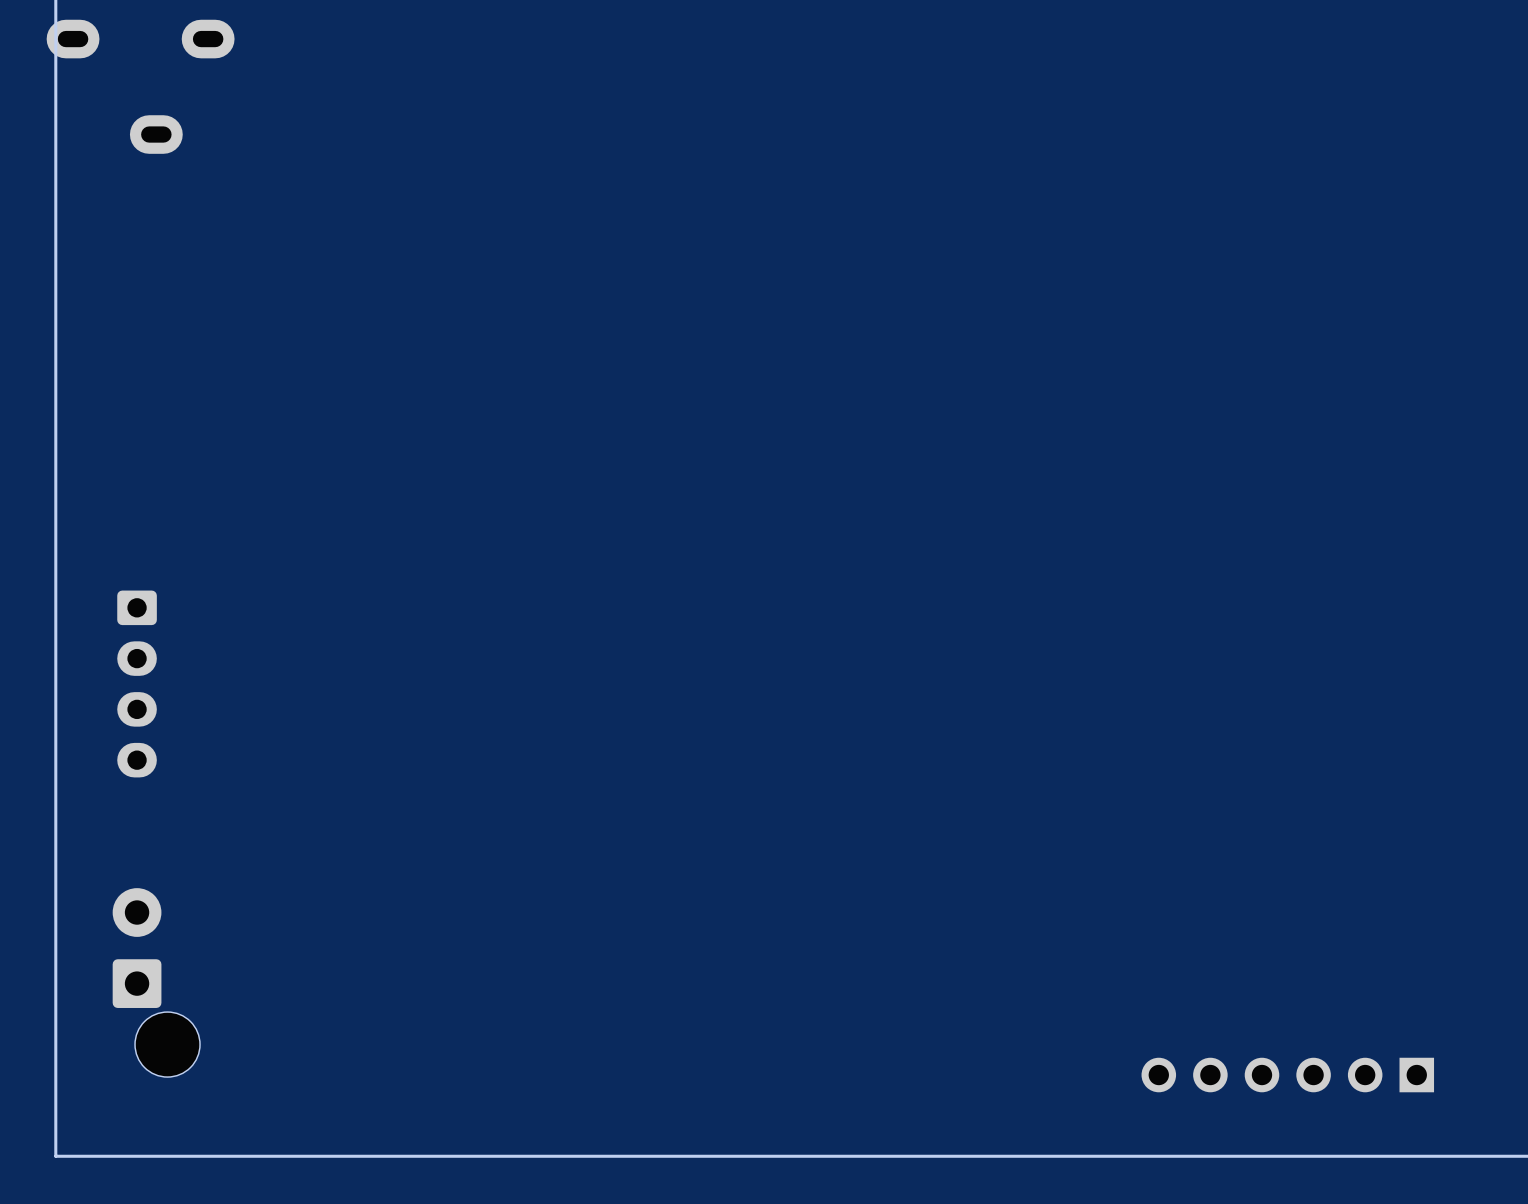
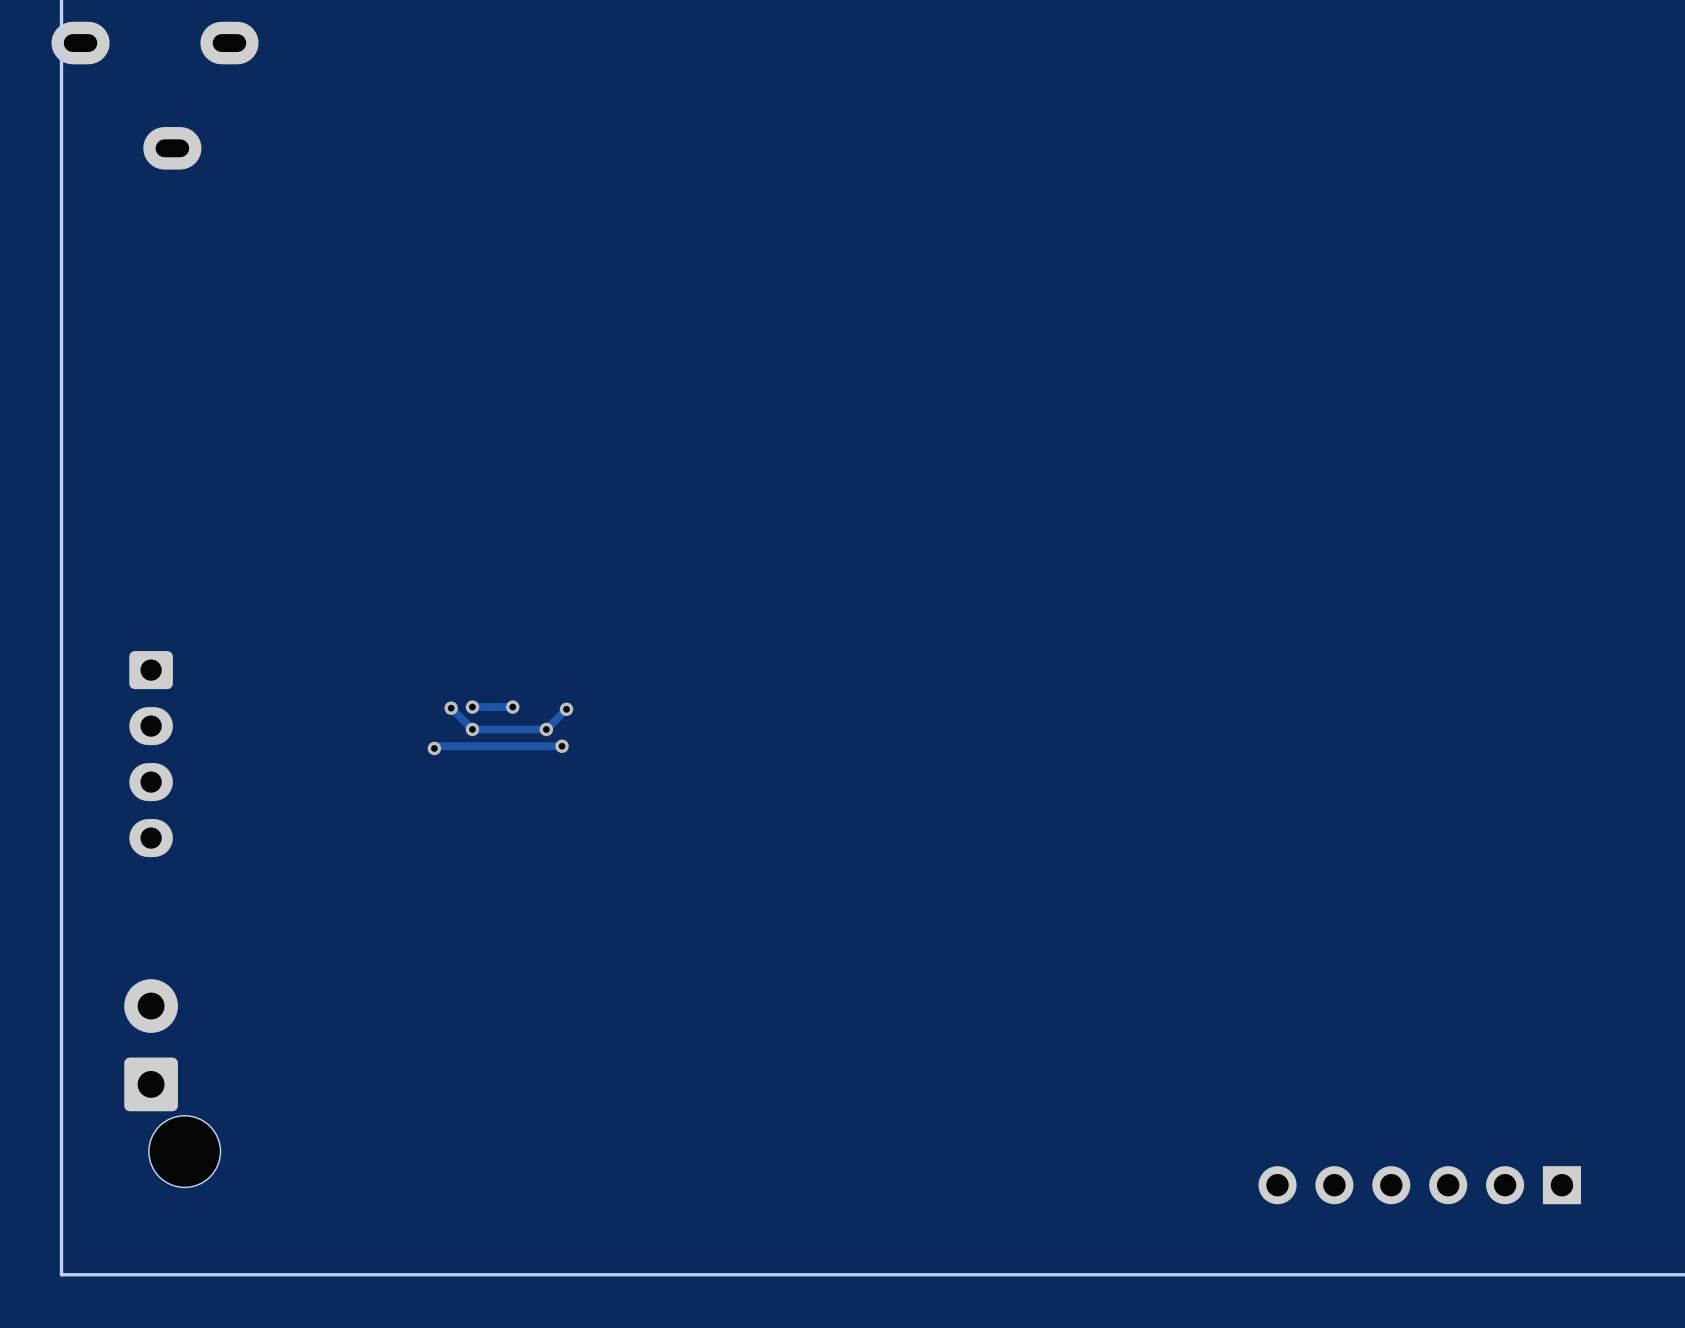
via: none -> (472, 707)
track: none -> (512, 707) (472, 707)
via: none -> (512, 707)
track: none -> (451, 708) (472, 729) (546, 729) (566, 709)
via: none -> (451, 708)
via: none -> (566, 709)
via: none -> (472, 729)
via: none -> (546, 729)
track: none -> (562, 746) (436, 746)
via: none -> (562, 746)
via: none -> (434, 748)

